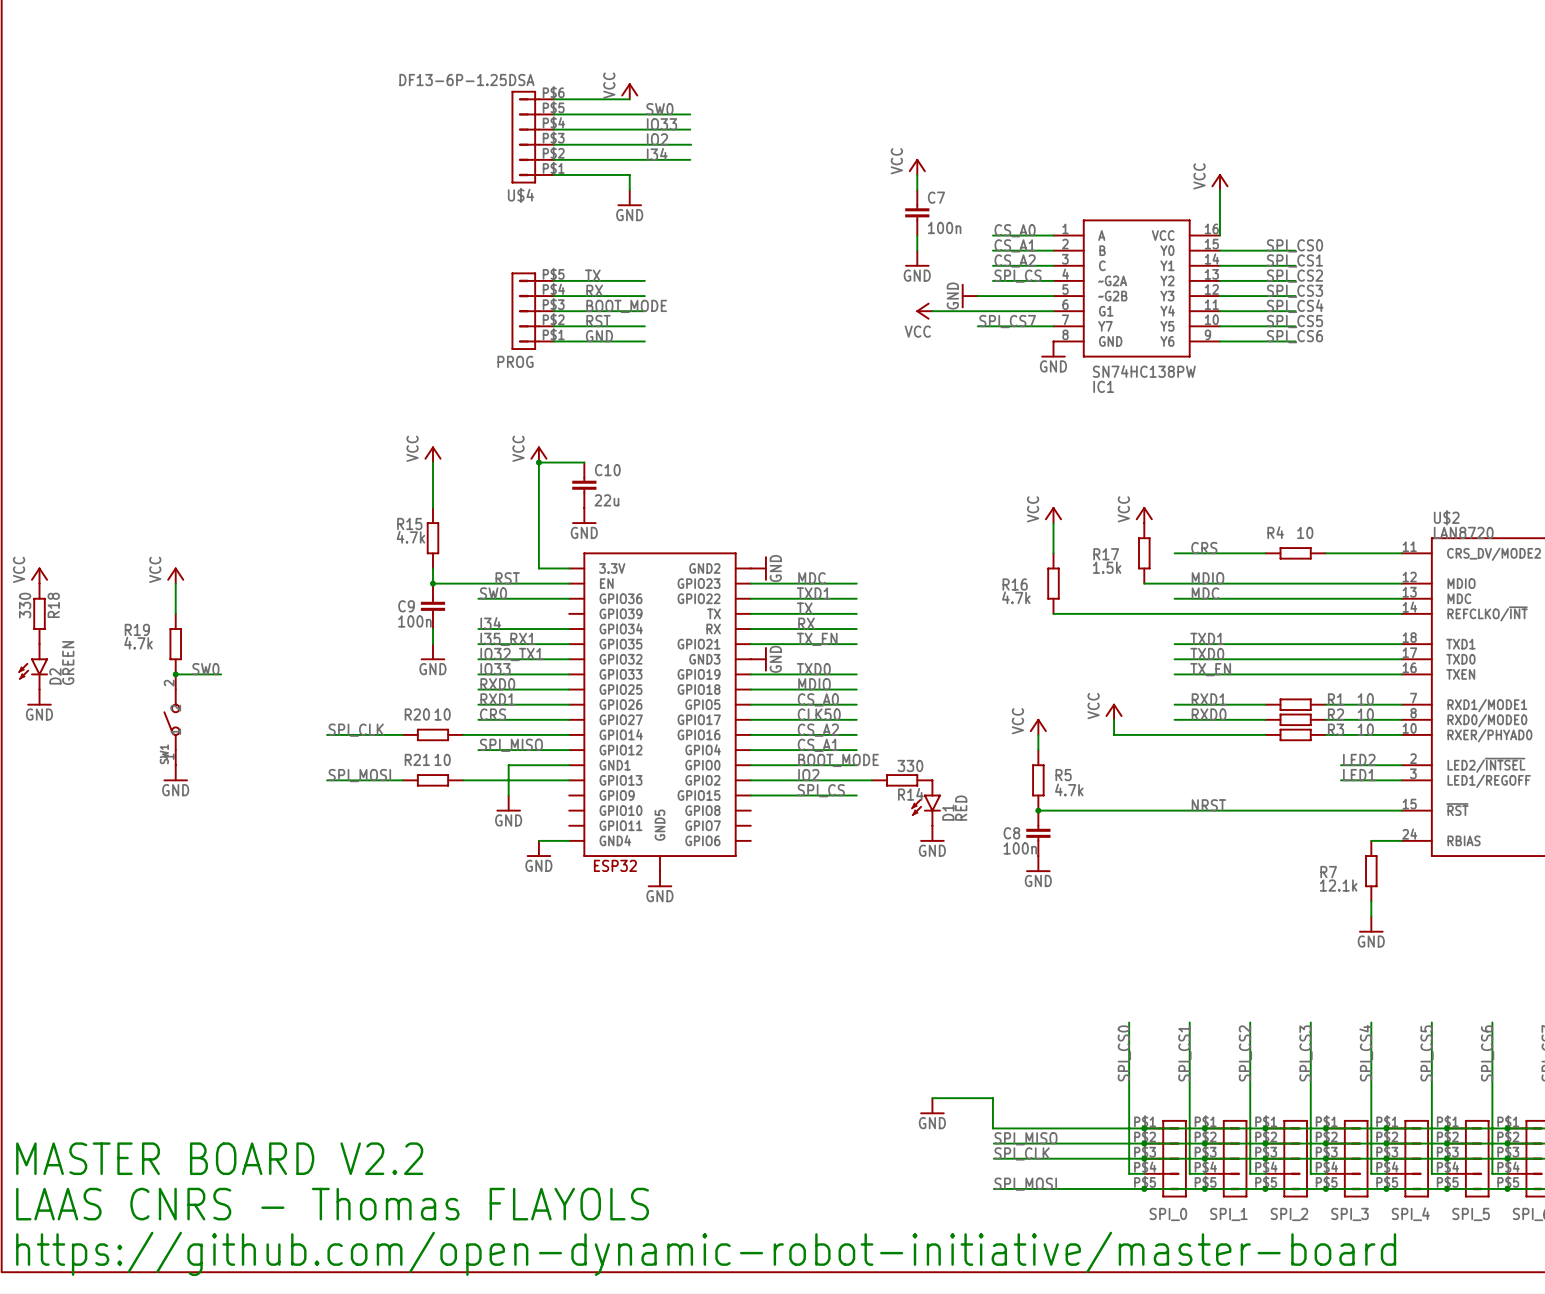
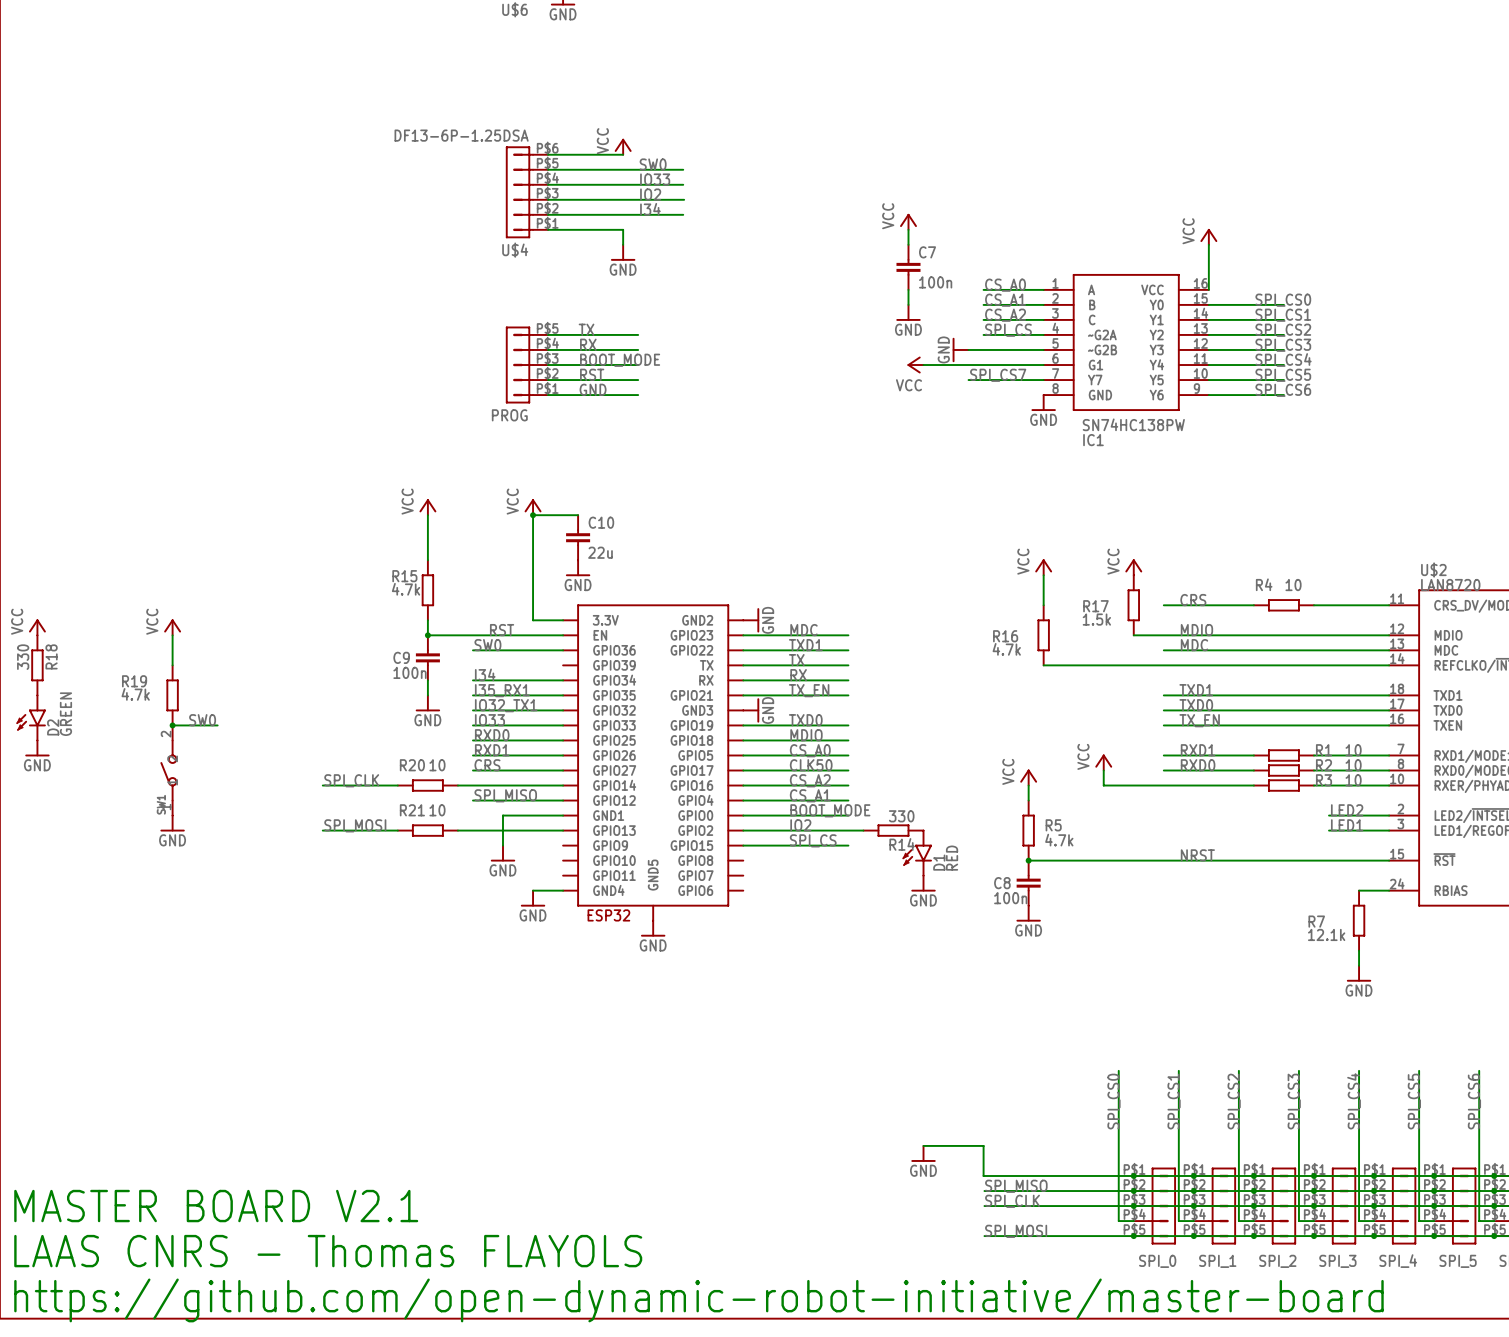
text: MASTER BOARD V2.2 (219, 1158) -> MASTER BOARD V2.1 (216, 1206)

